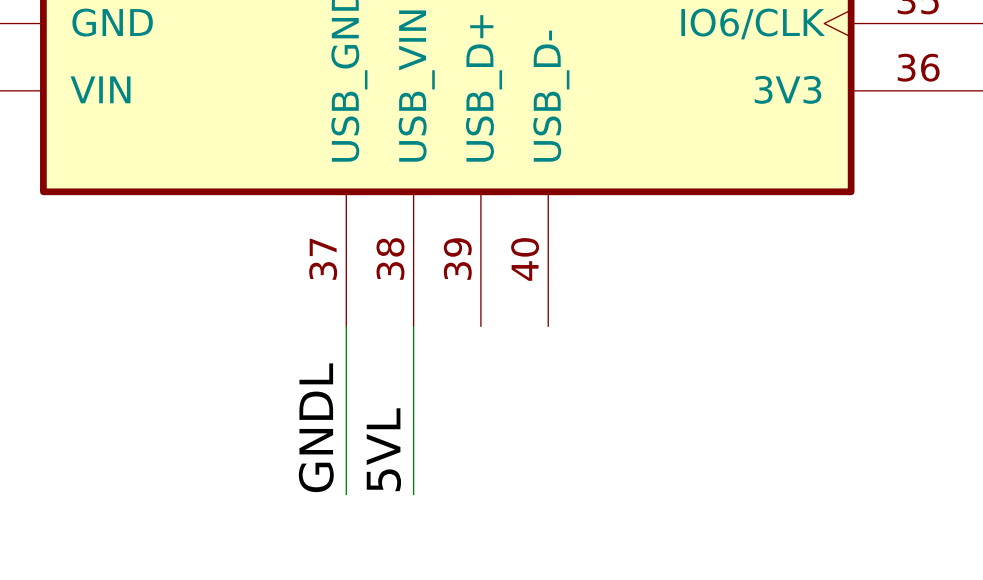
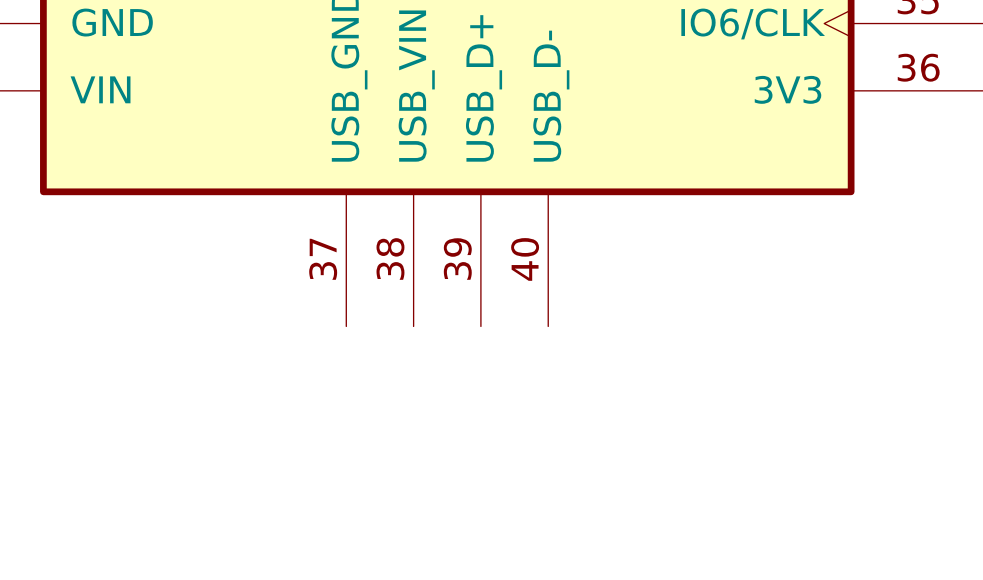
wire: (346, 326) (346, 494) -> none
wire: (413, 326) (413, 494) -> none
label: GNDL (316, 427) -> none
label: 5VL (383, 449) -> none

